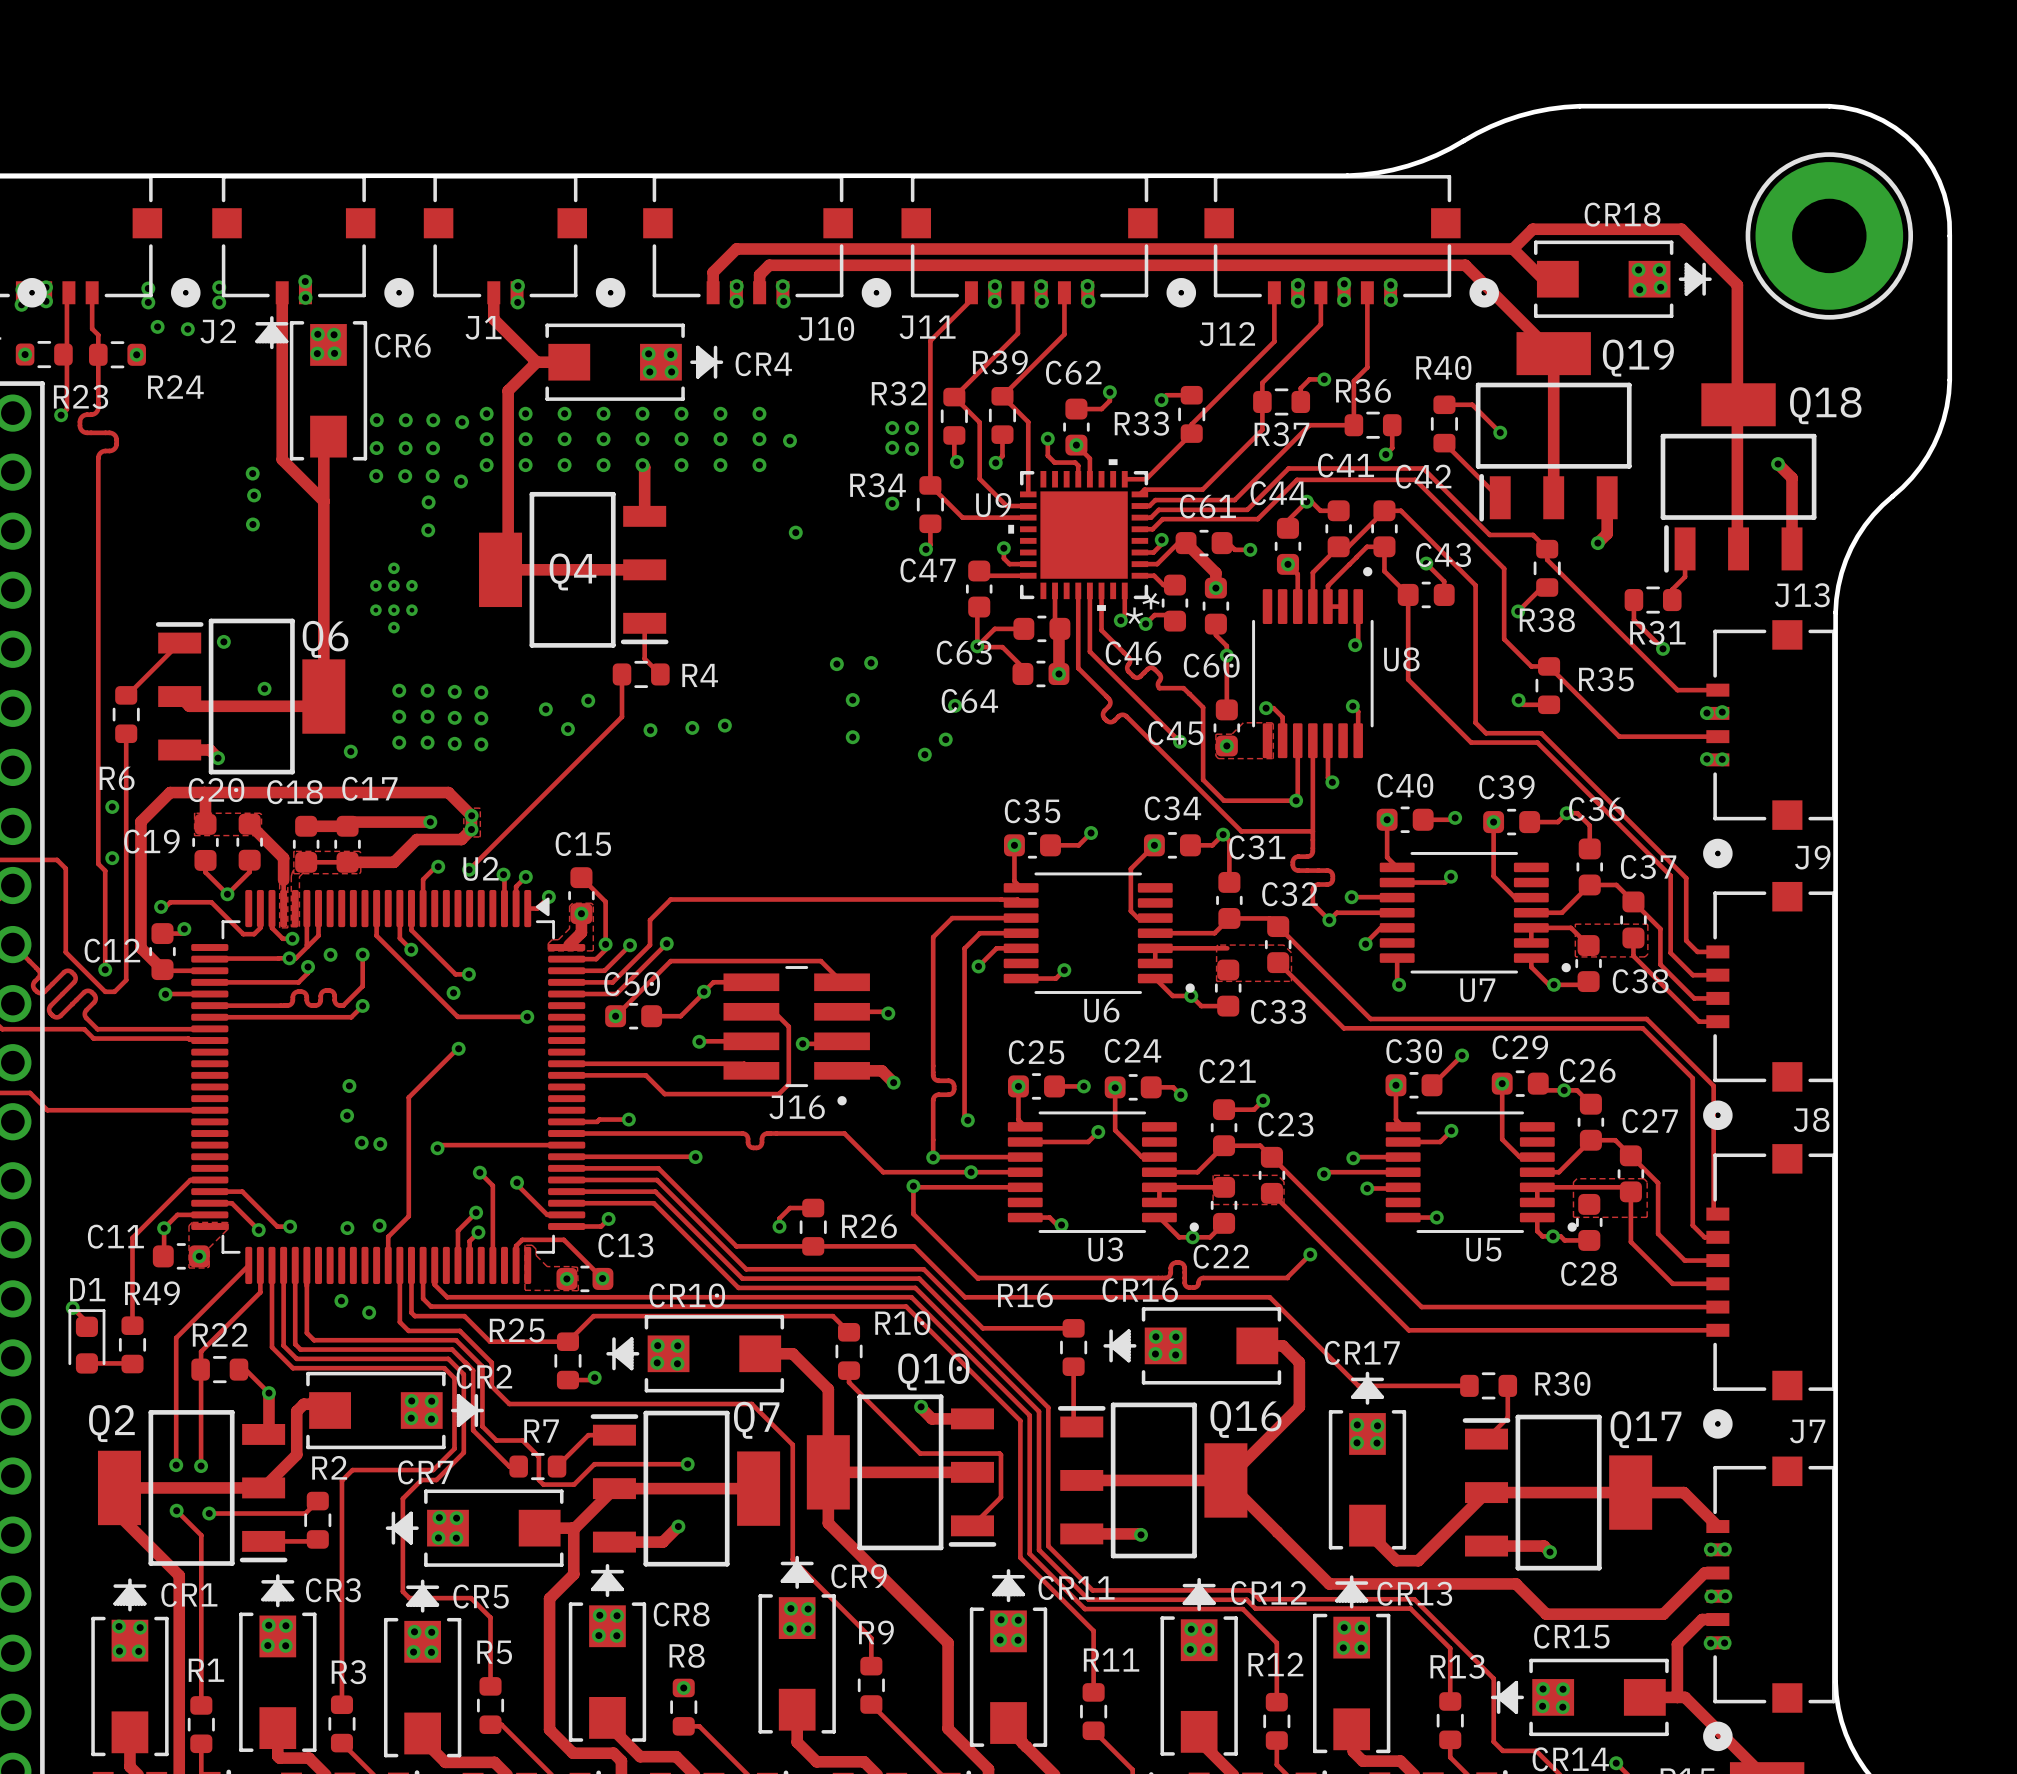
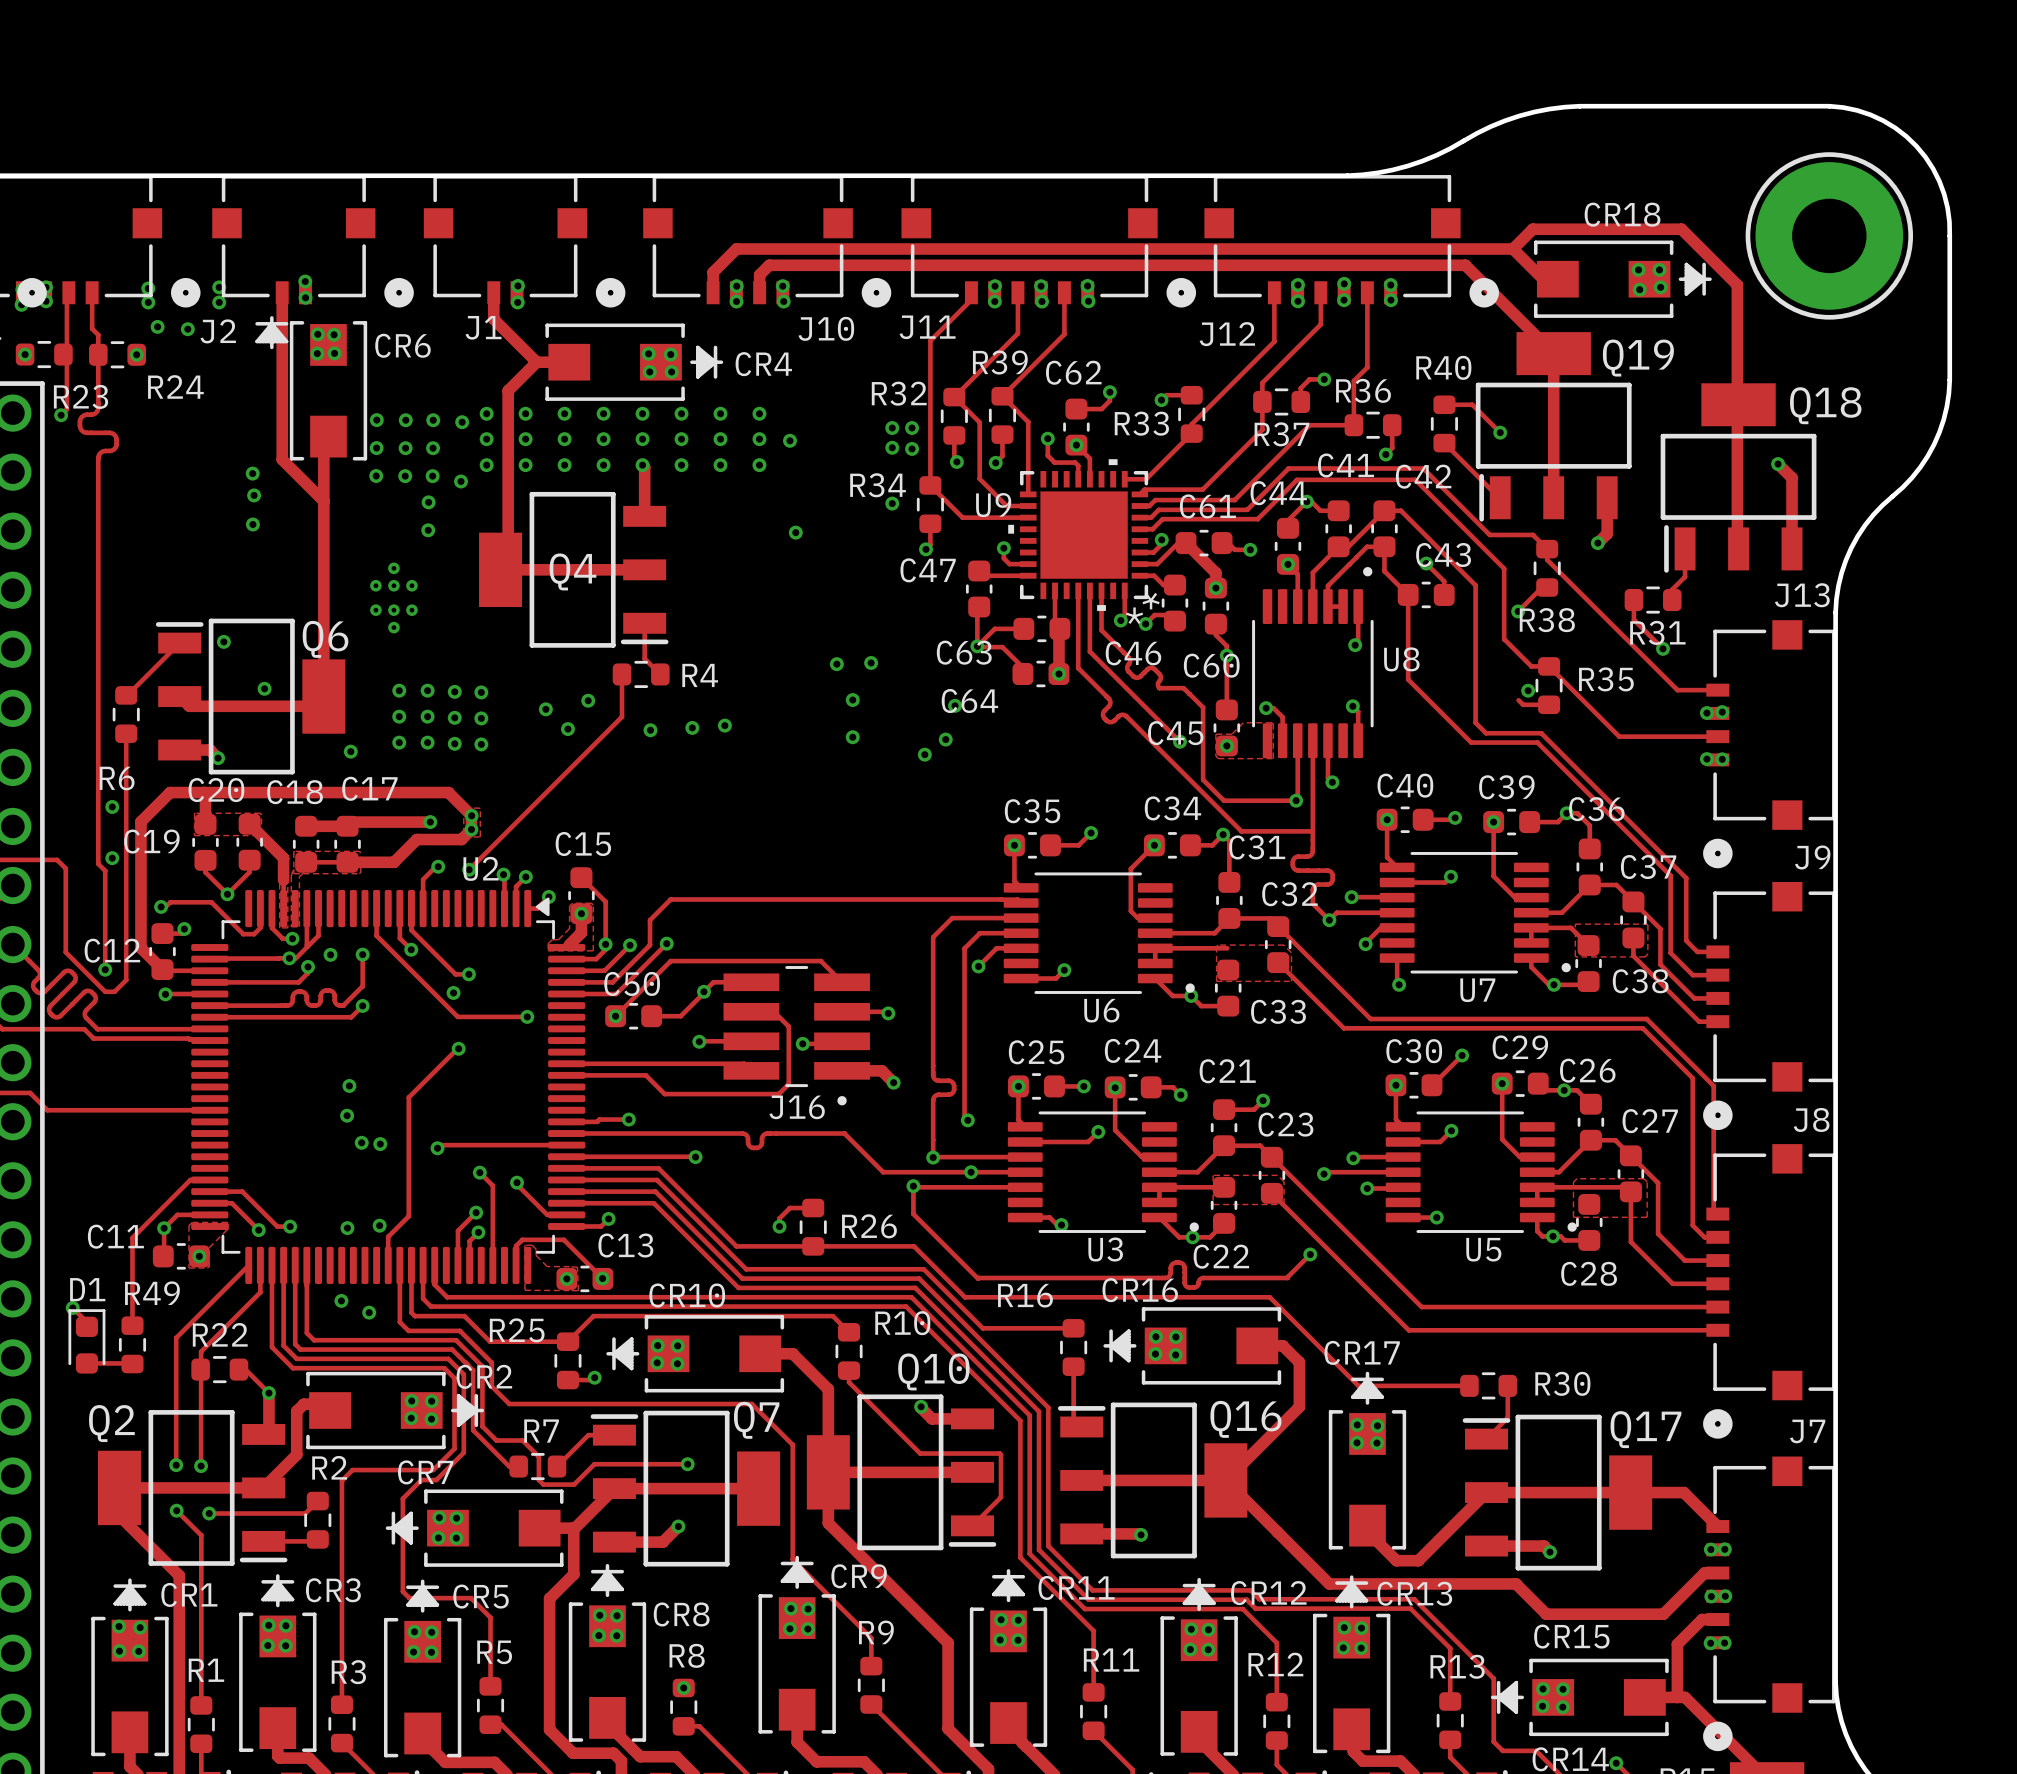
via position: (1518, 700) -> (1528, 690)

